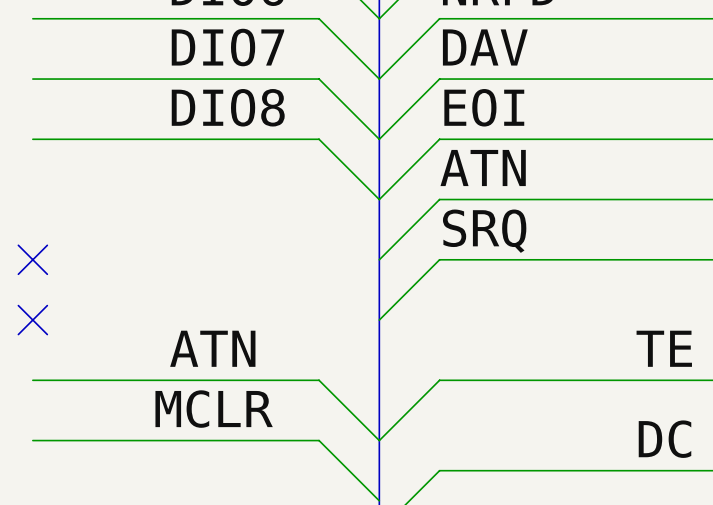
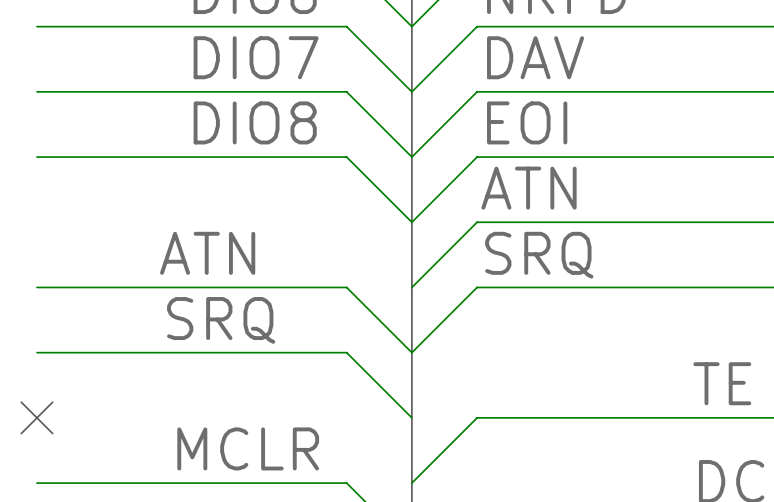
wire: none -> (36, 287) (346, 287) (411, 352)
no-connect mark: (32, 259) -> none
label: none -> SRQ (221, 320)
no-connect mark: (32, 320) -> none
label position: ATN (212, 348) -> ATN (207, 253)
wire: (32, 380) (319, 380) (379, 440) -> (36, 352) (346, 352) (411, 417)
no-connect mark: none -> (36, 417)

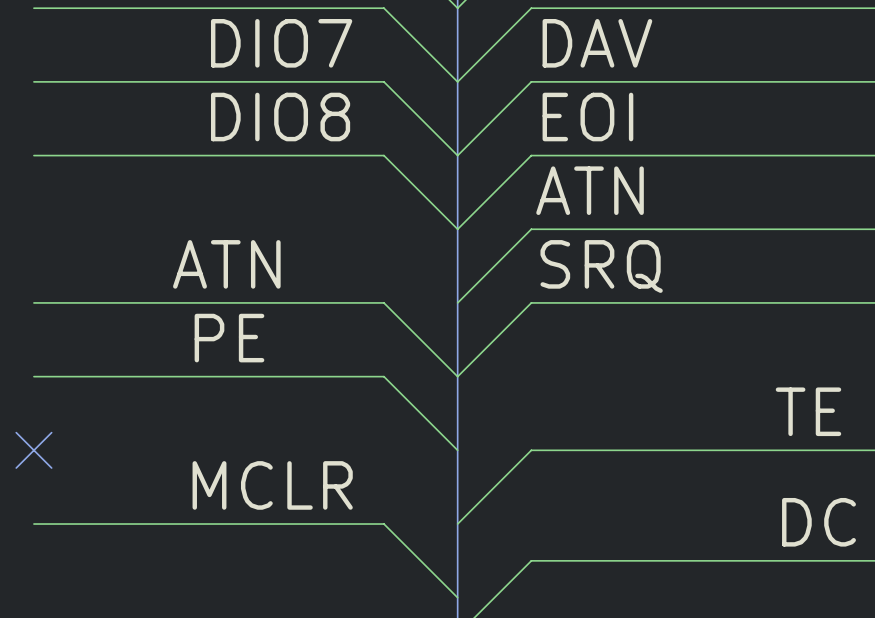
label: none -> PE (229, 338)
label: SRQ (221, 320) -> none

